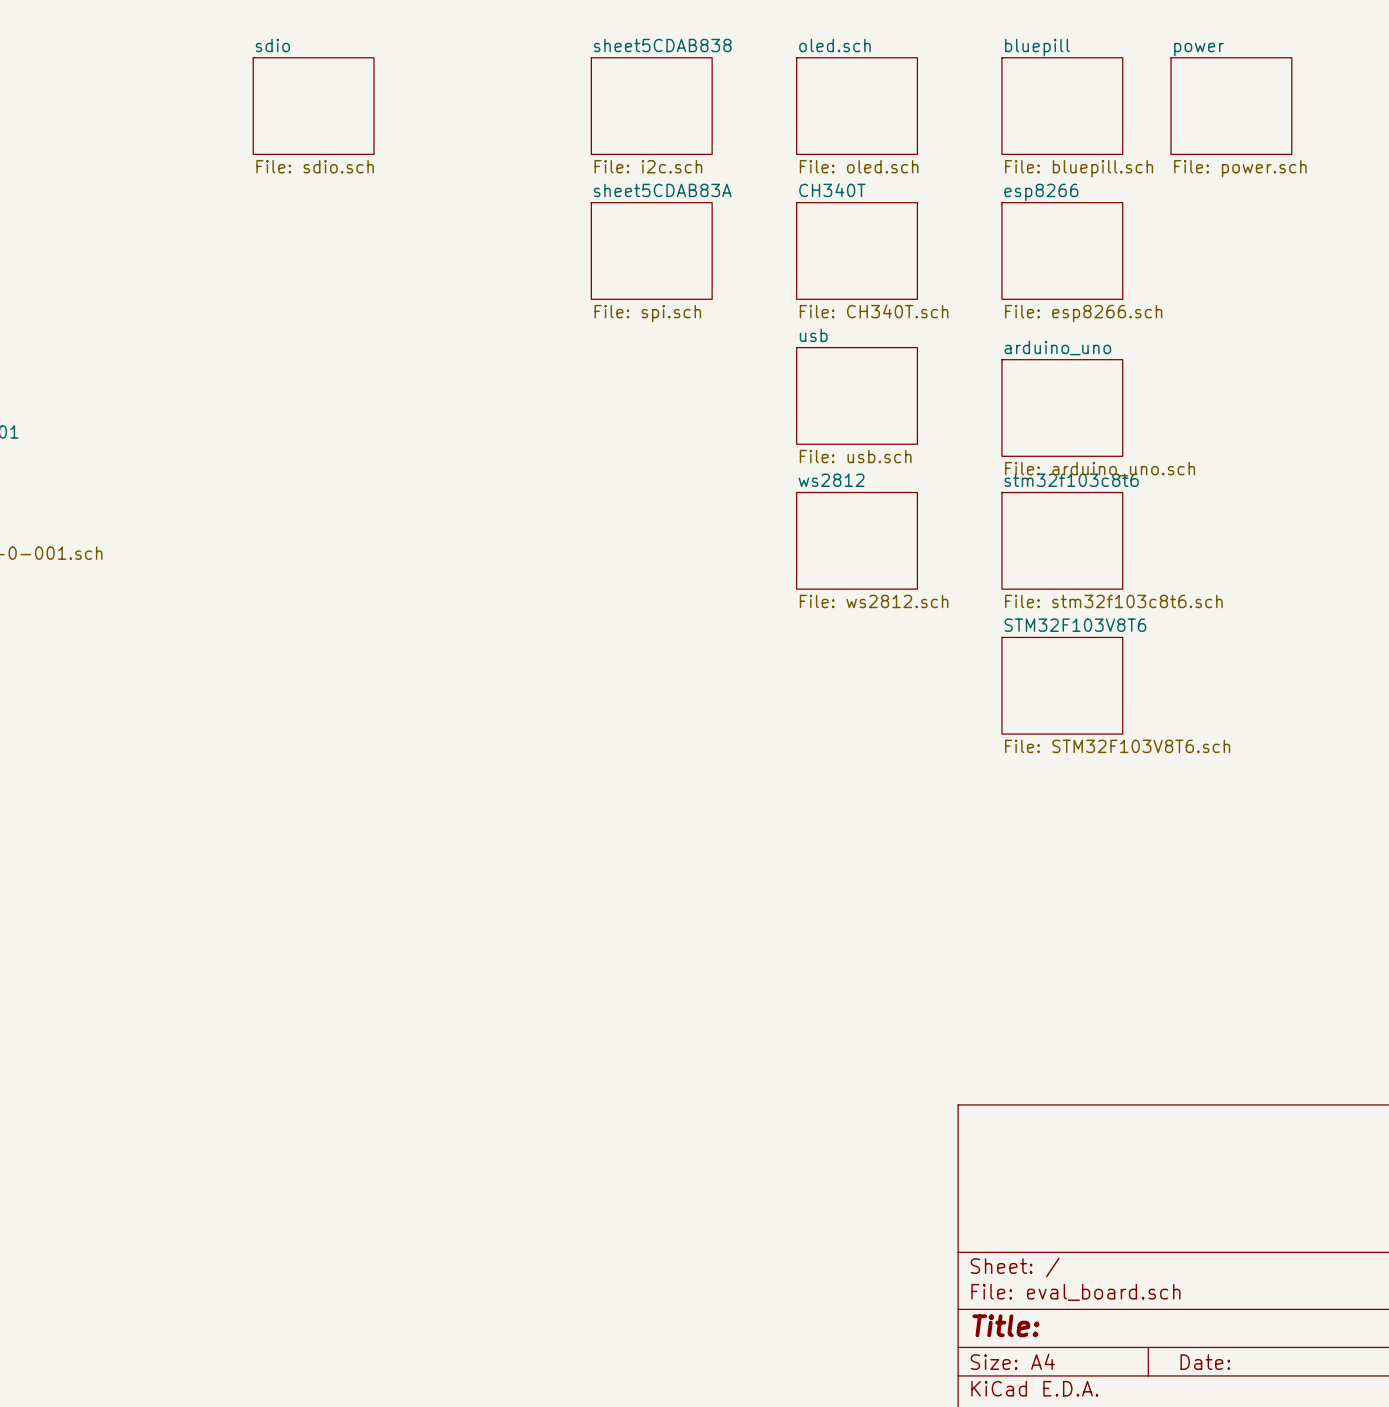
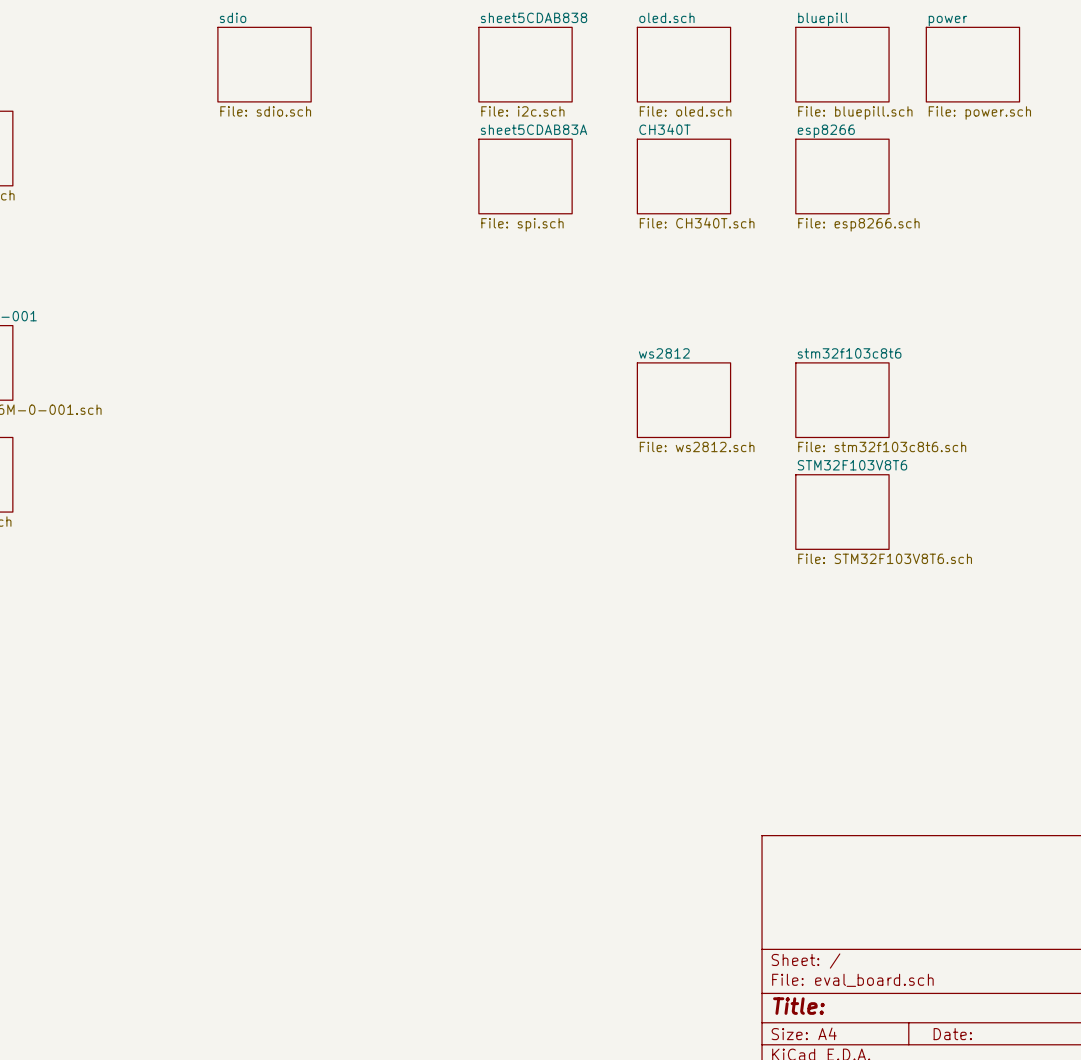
sheet usb: File: usb.sch (857, 395) -> none
sheet arduino_uno: File: arduino_uno.sch (1062, 407) -> none

